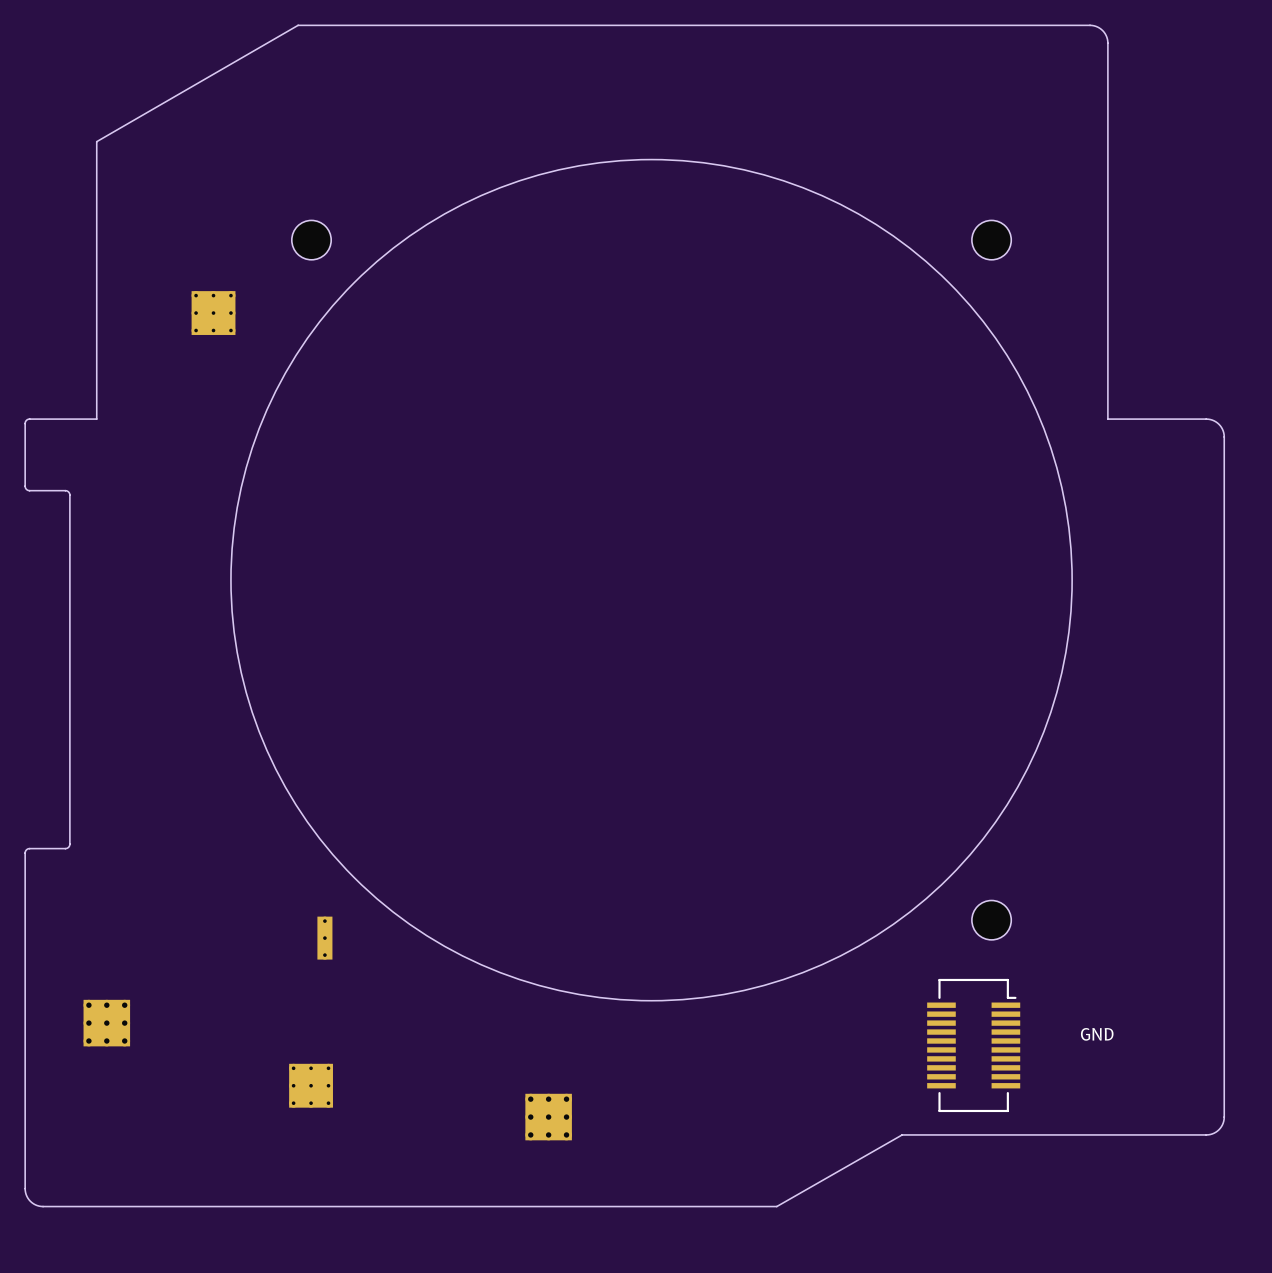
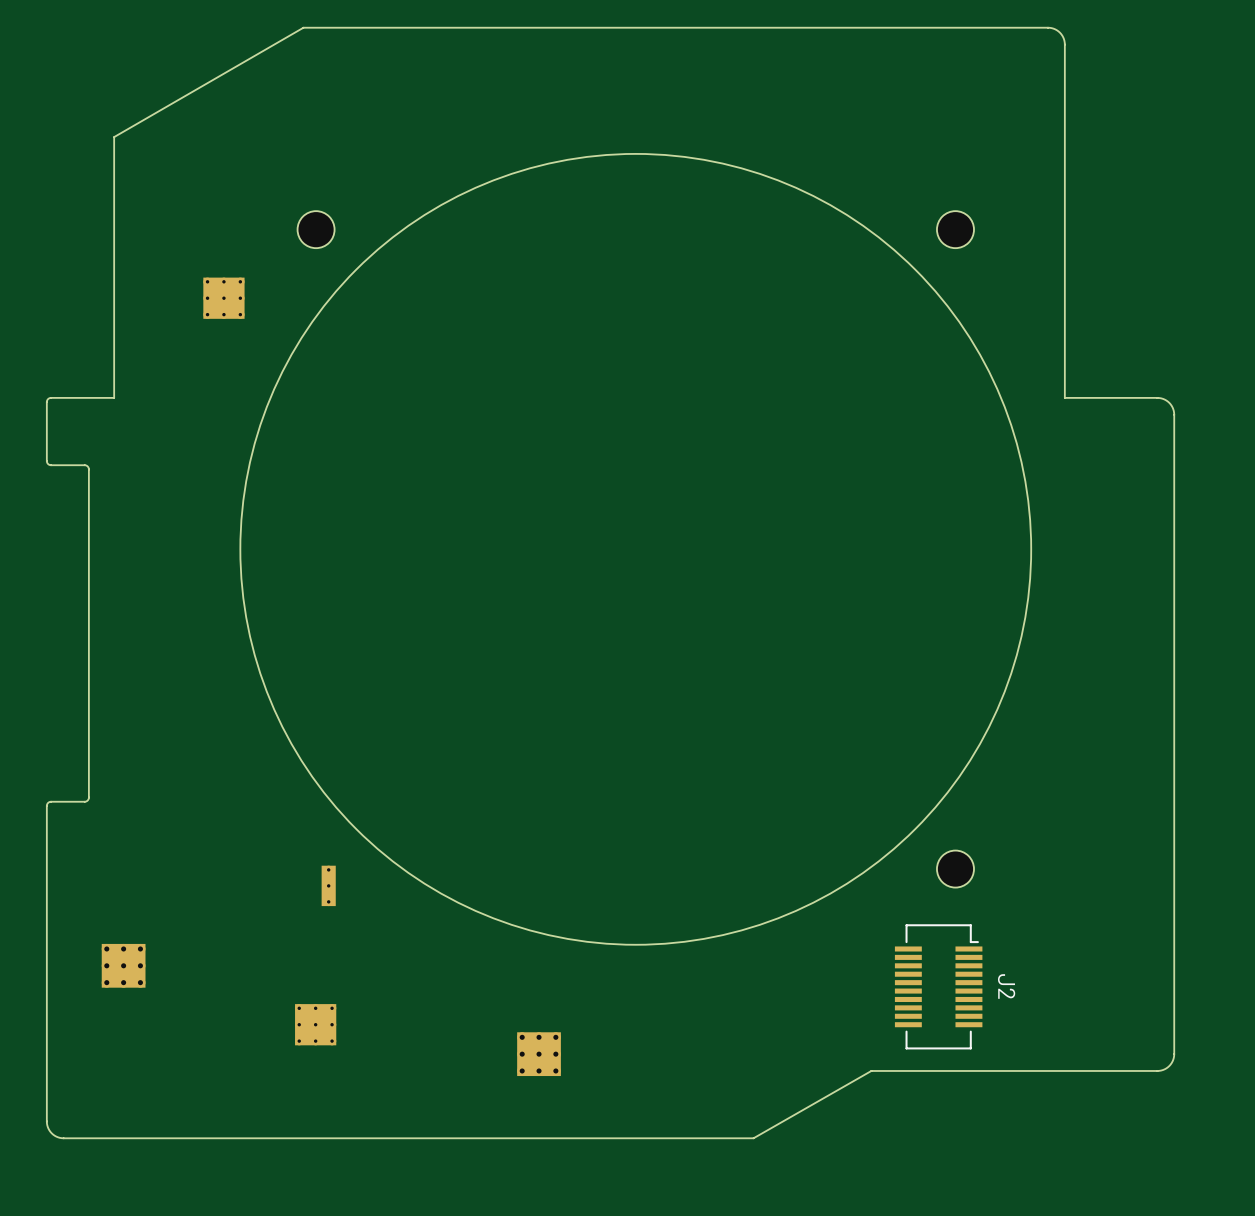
text: GND (1097, 1034) -> none
J2 name: none -> J2 (1006, 986)

